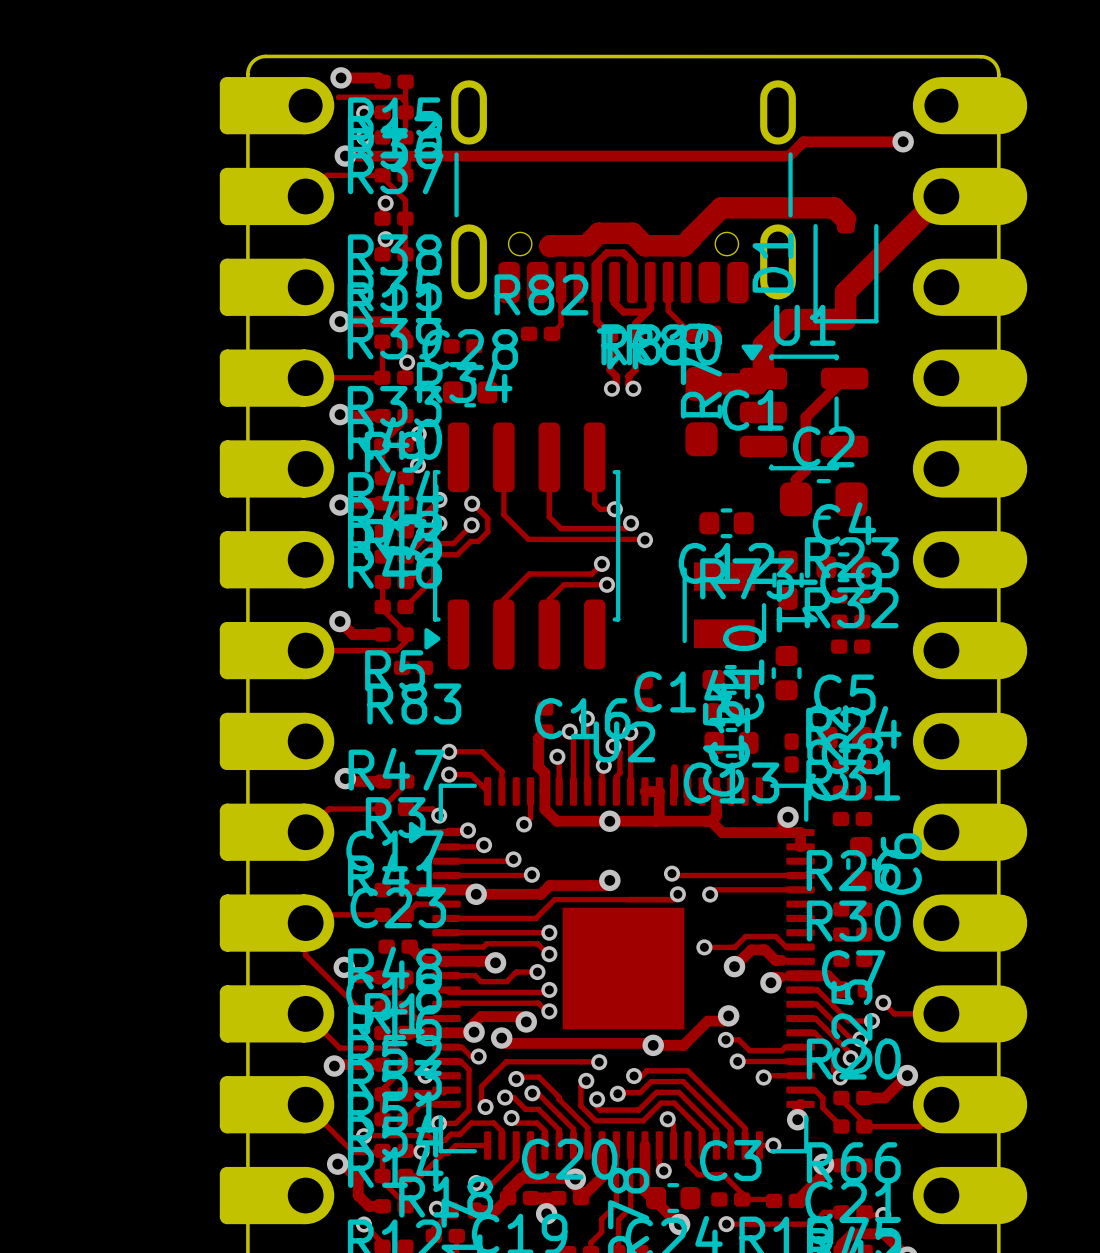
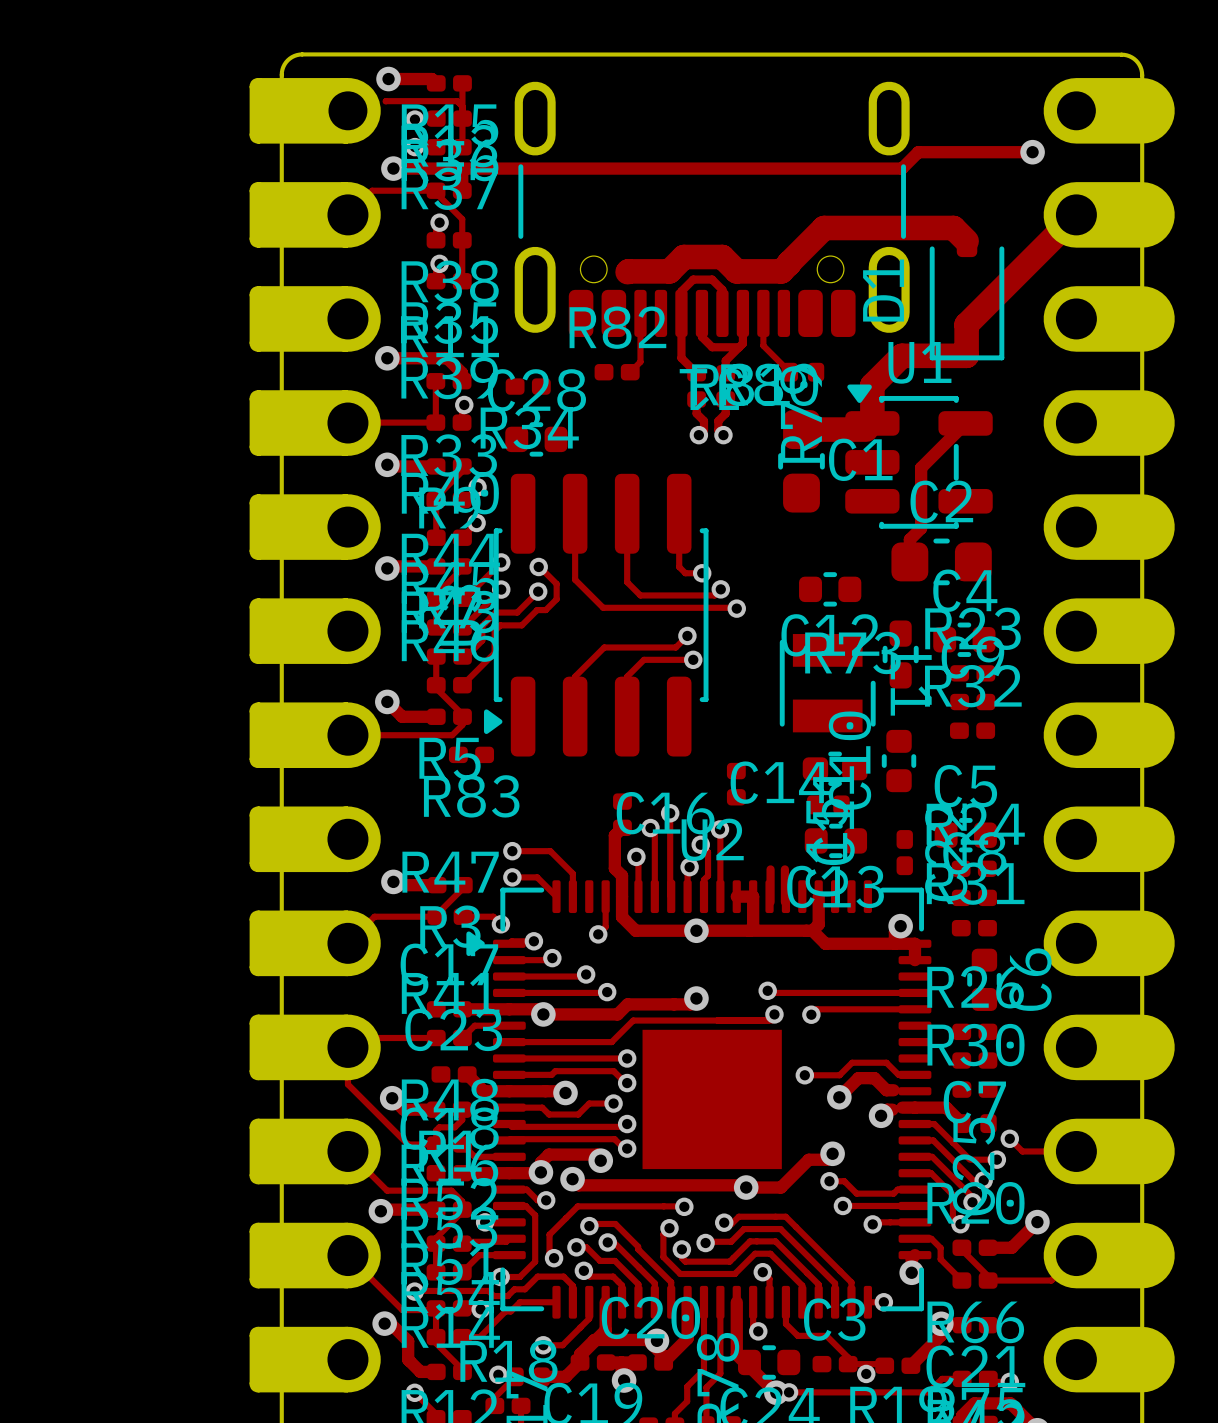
via: none -> (866, 1373)
track: none -> (789, 1392) (830, 1392)
via: none -> (789, 1392)
via: (726, 1224) -> none

